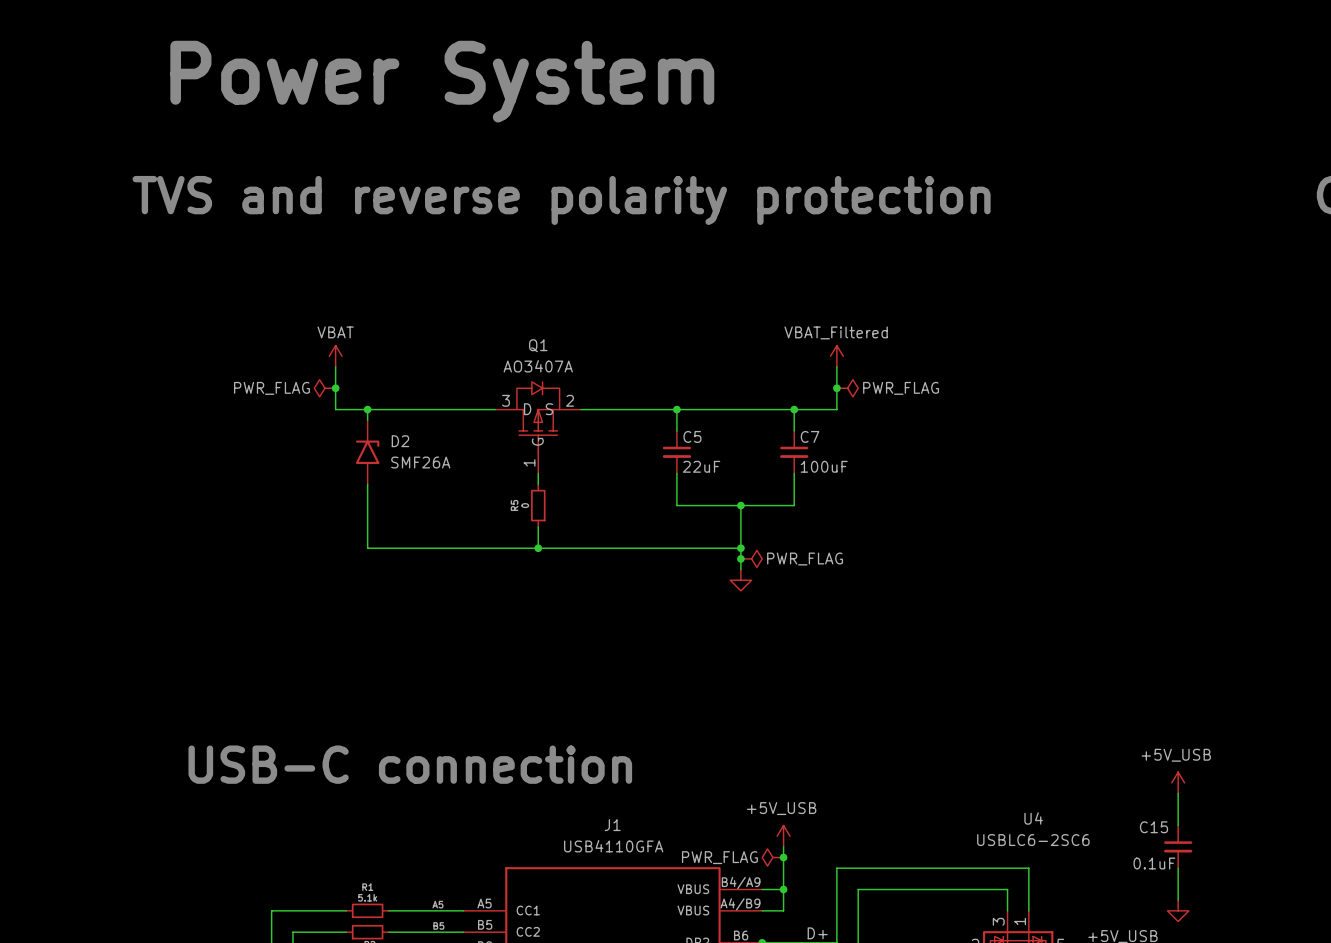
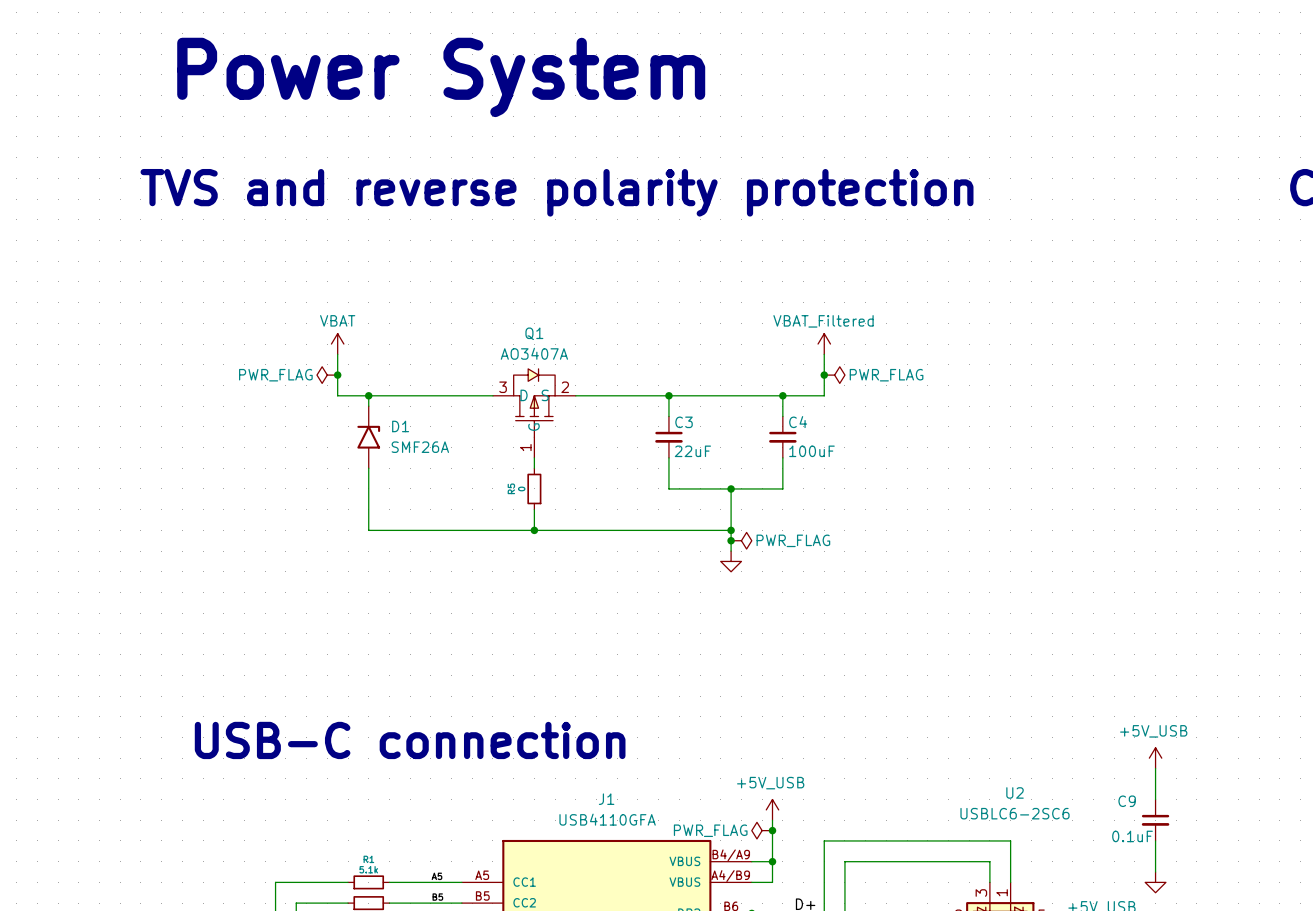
C5 name: C5 (692, 436) -> C3 (684, 422)
C7 name: C7 (810, 436) -> C4 (798, 422)
D2 name: D2 (400, 441) -> D1 (400, 426)
U4 name: U4 (1033, 818) -> U2 (1015, 792)
C15 name: C15 (1153, 827) -> C9 (1127, 801)

